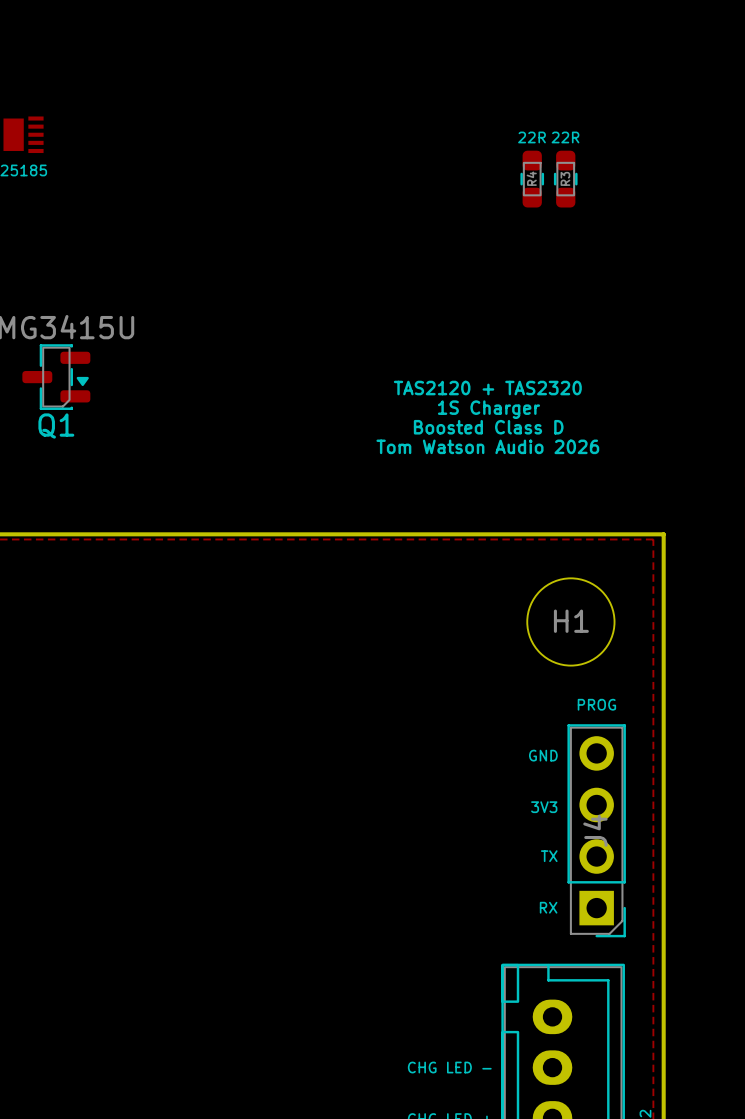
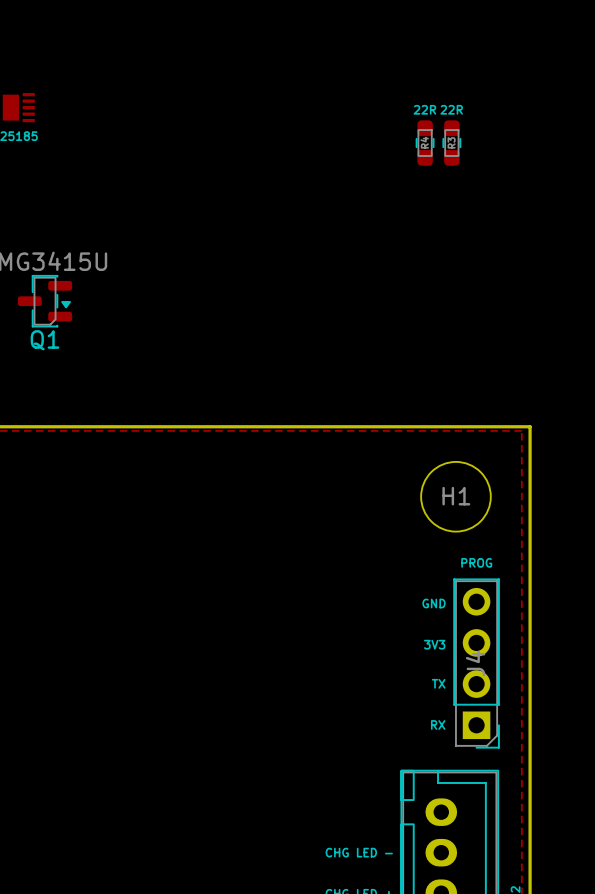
text: TAS2120 + TAS2320 (487, 388) -> none
text: 1S Charger (488, 409) -> none
text: Boosted Class D (488, 427) -> none
text: Tom Watson Audio 2026 (487, 446) -> none

